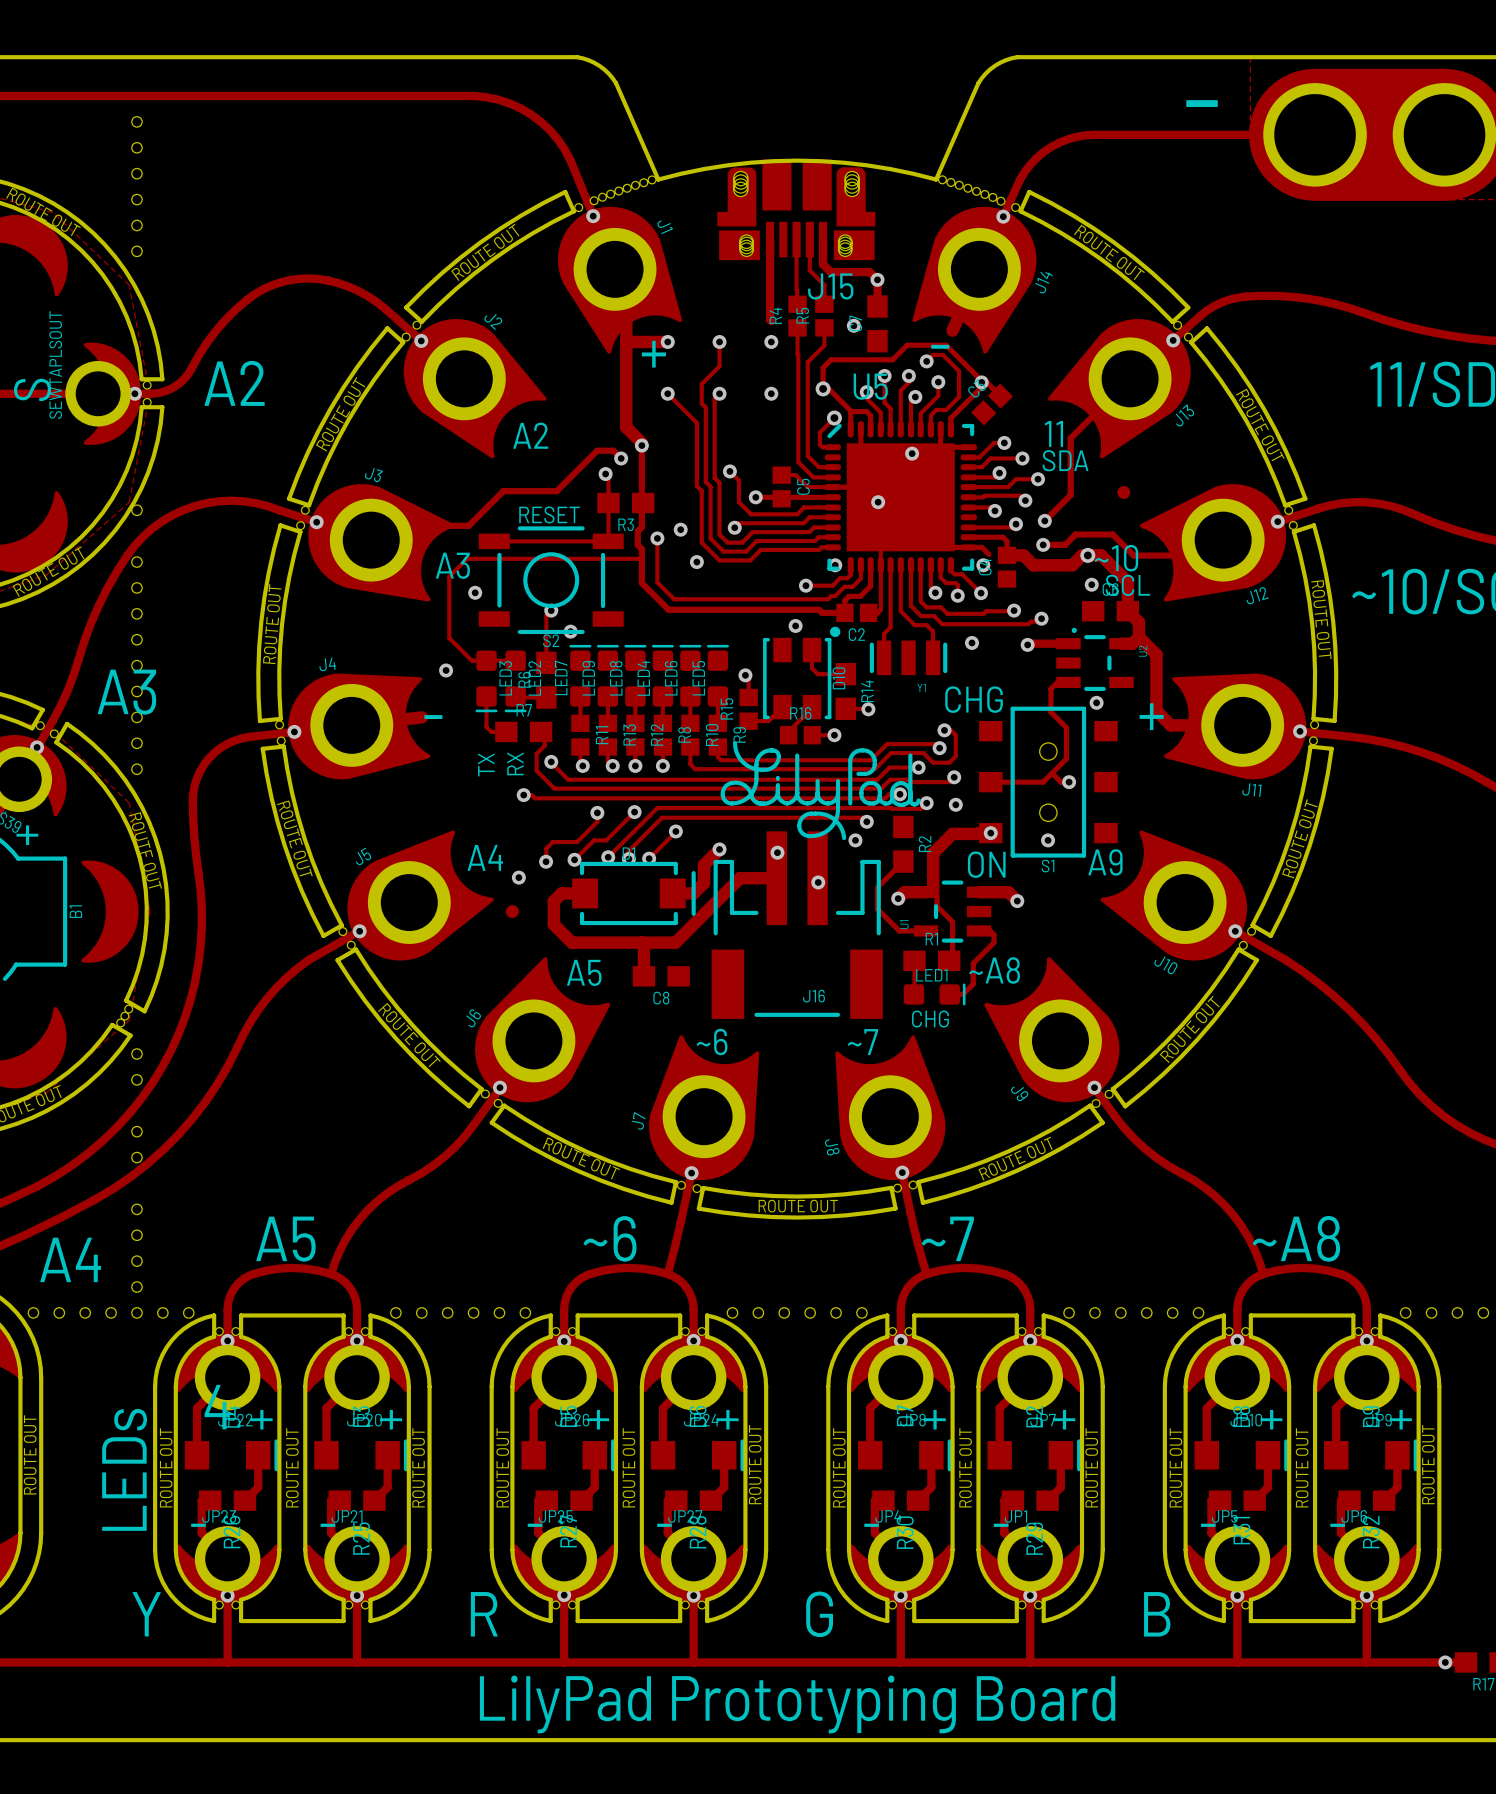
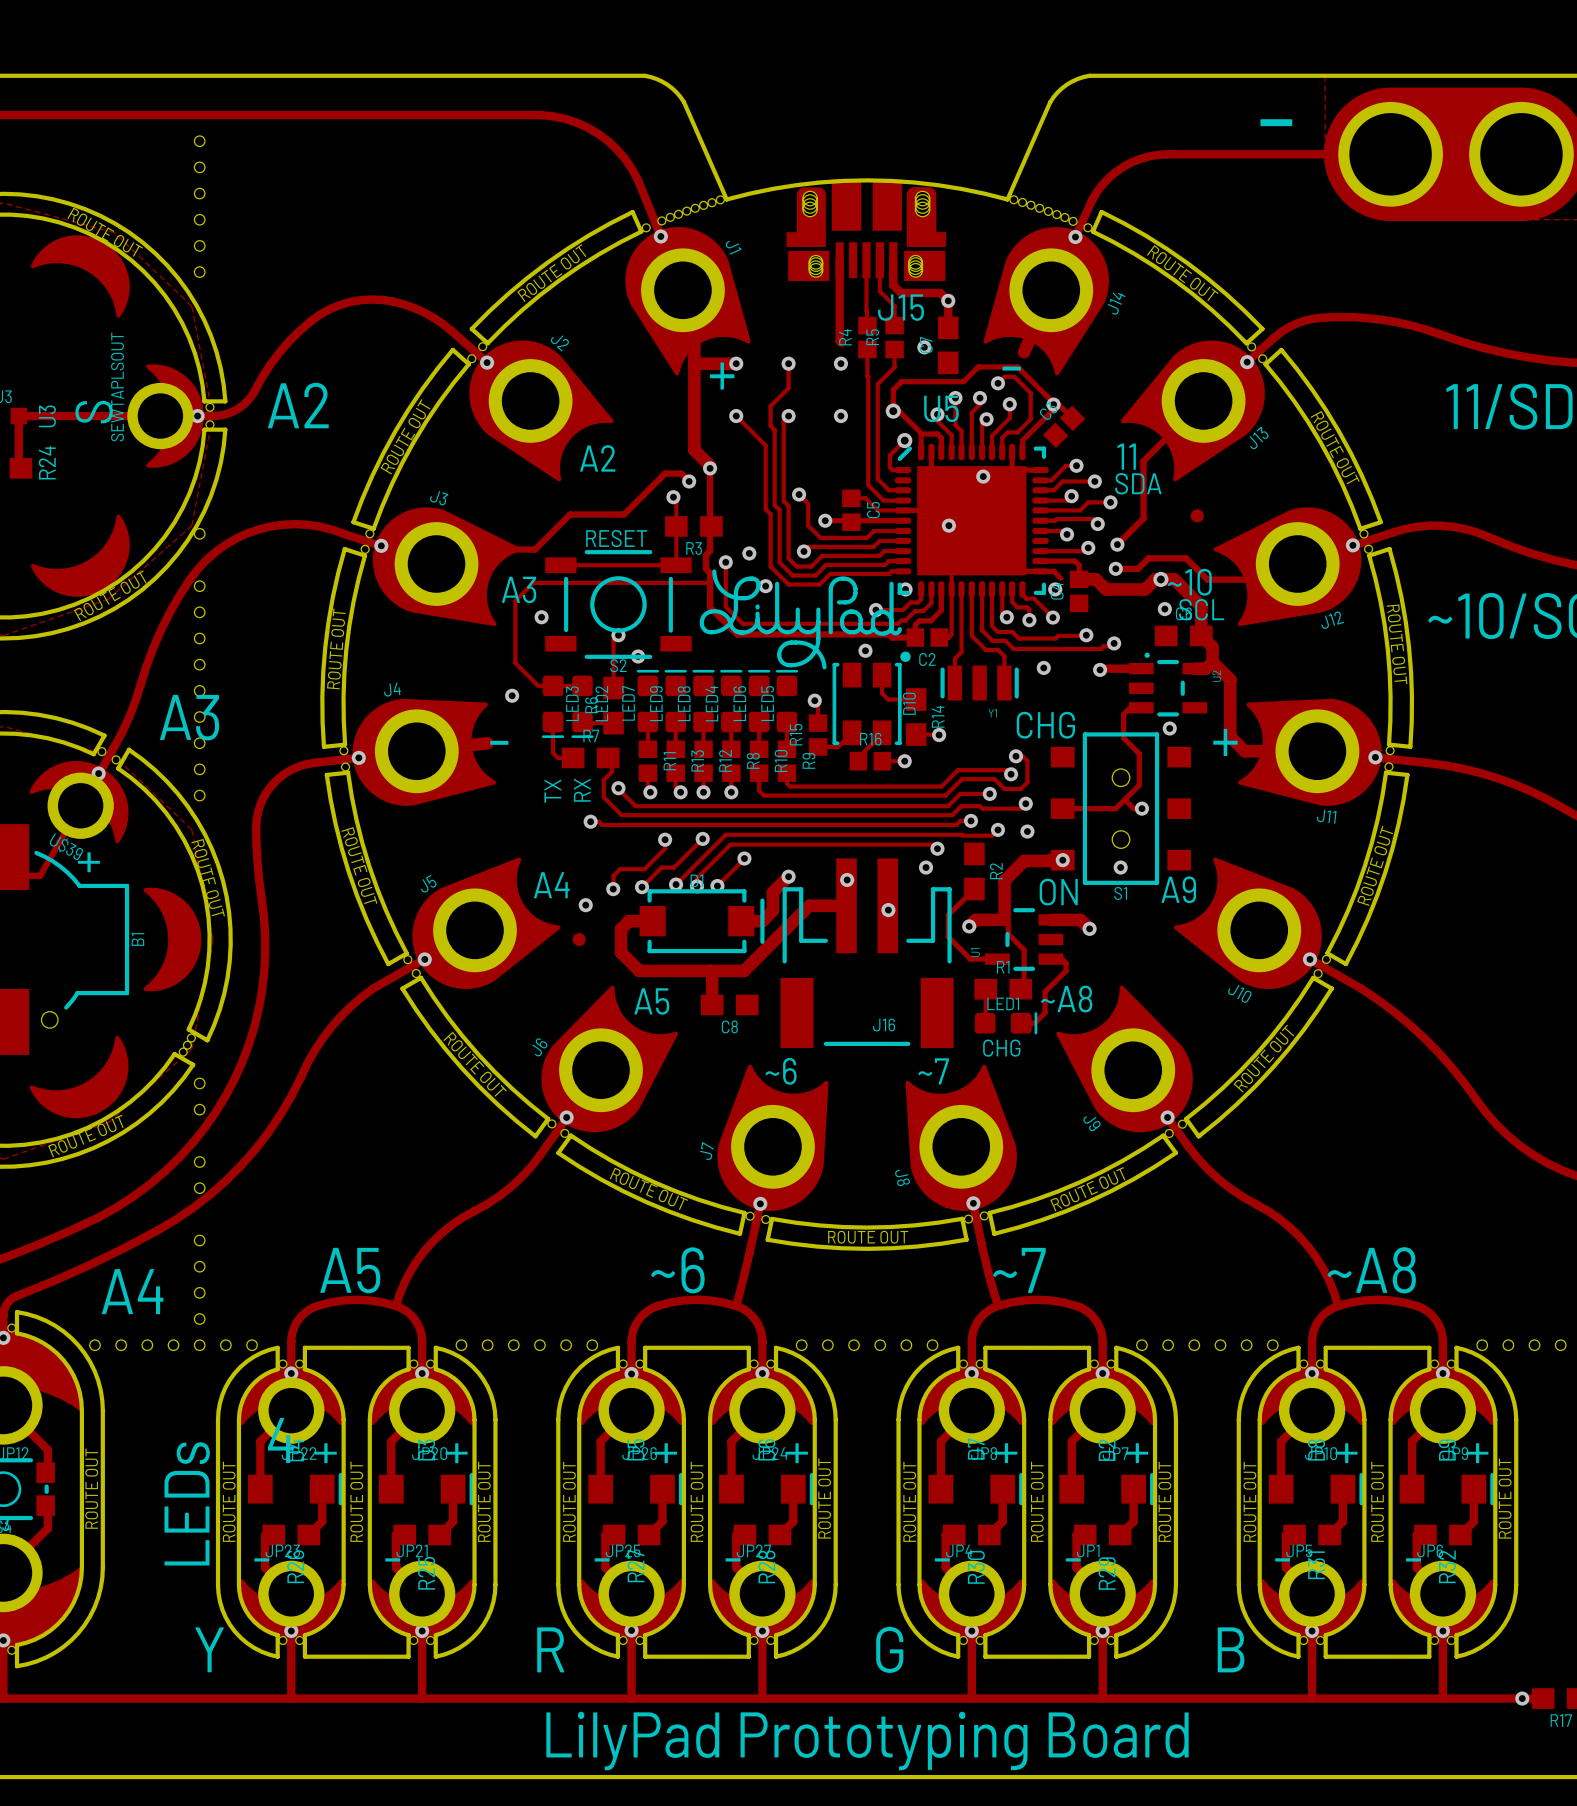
drawing position: (820, 790) -> (800, 619)

